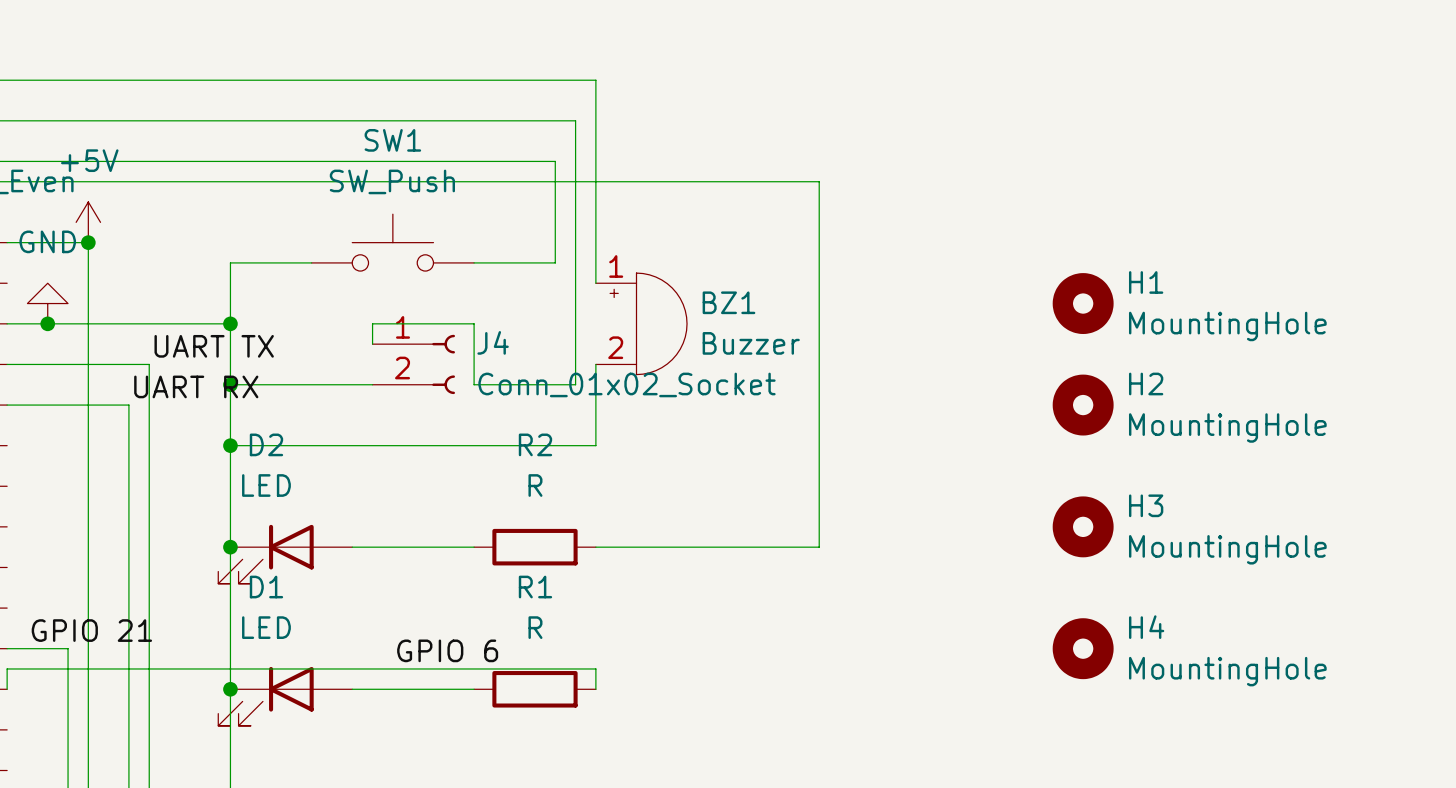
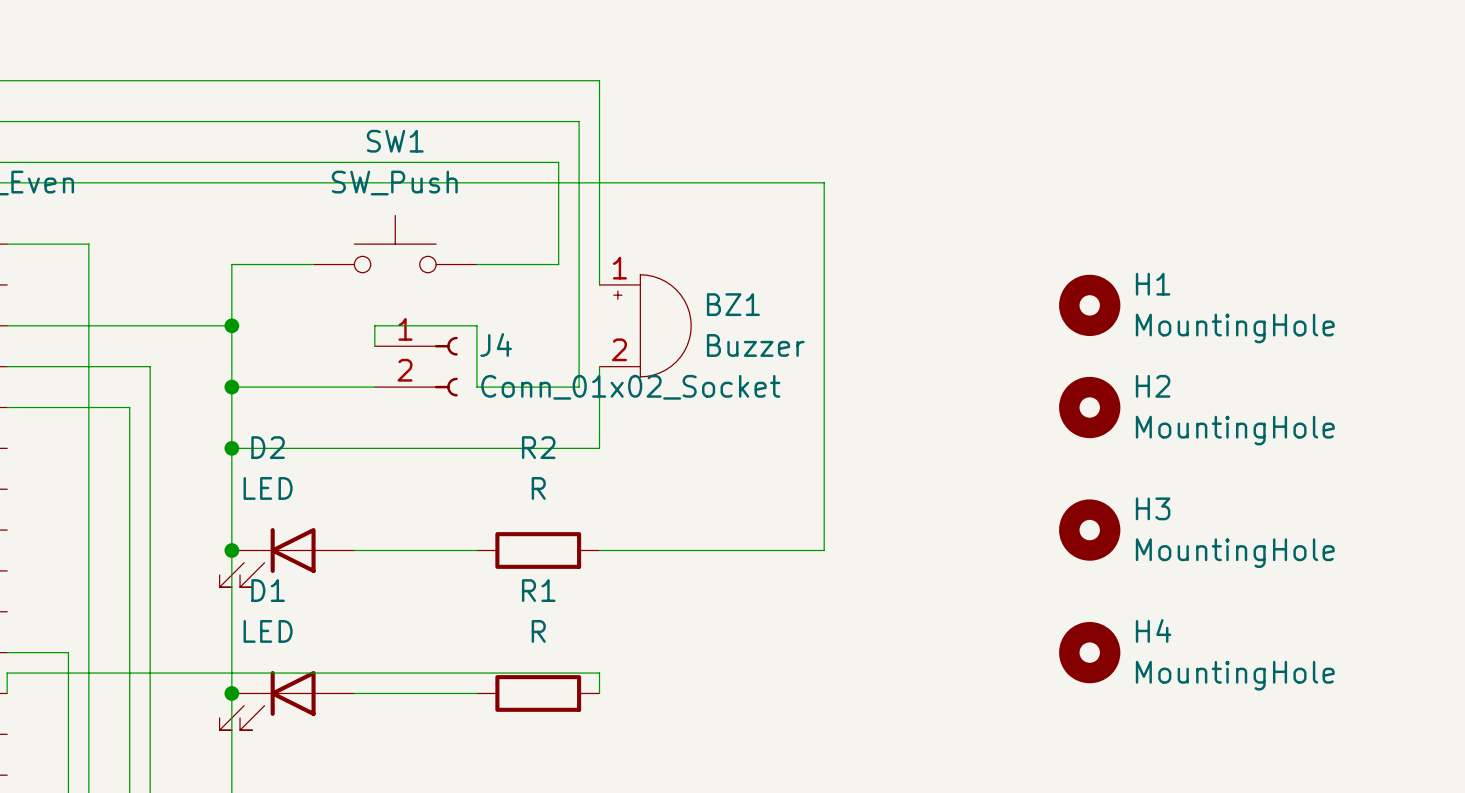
power symbol: +5V (88, 222) -> none
junction: (88, 242) -> none
power symbol: GND (47, 303) -> none
junction: (47, 323) -> none
label: UART TX (214, 346) -> none
label: UART RX (196, 386) -> none
label: GPIO 21 (91, 630) -> none
label: GPIO 6 (447, 650) -> none

